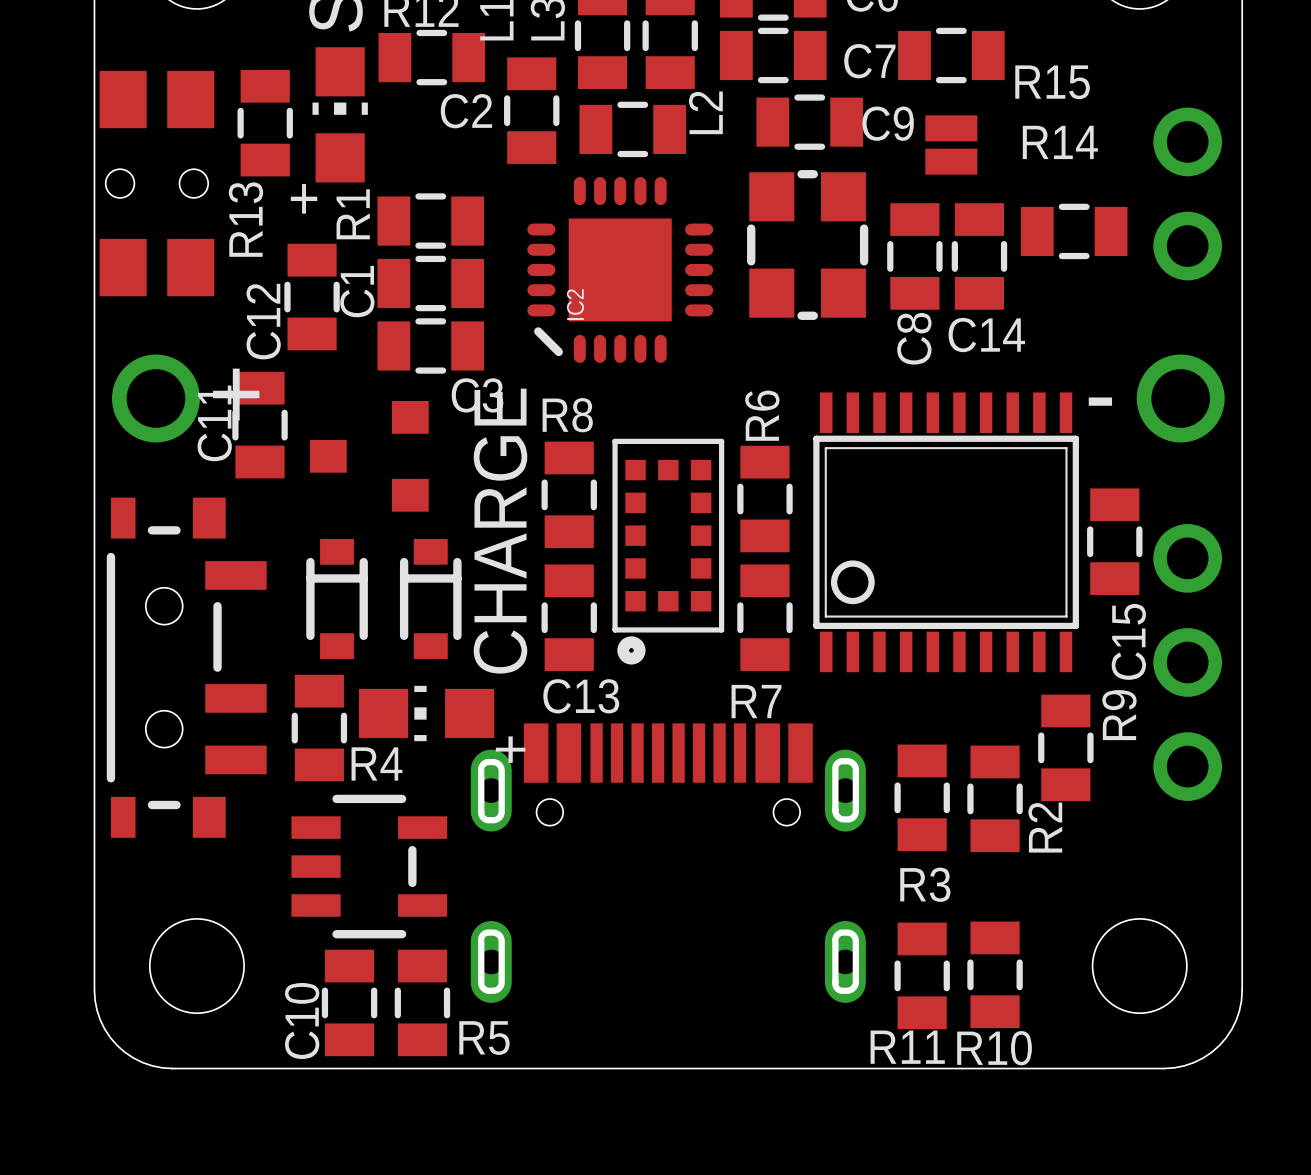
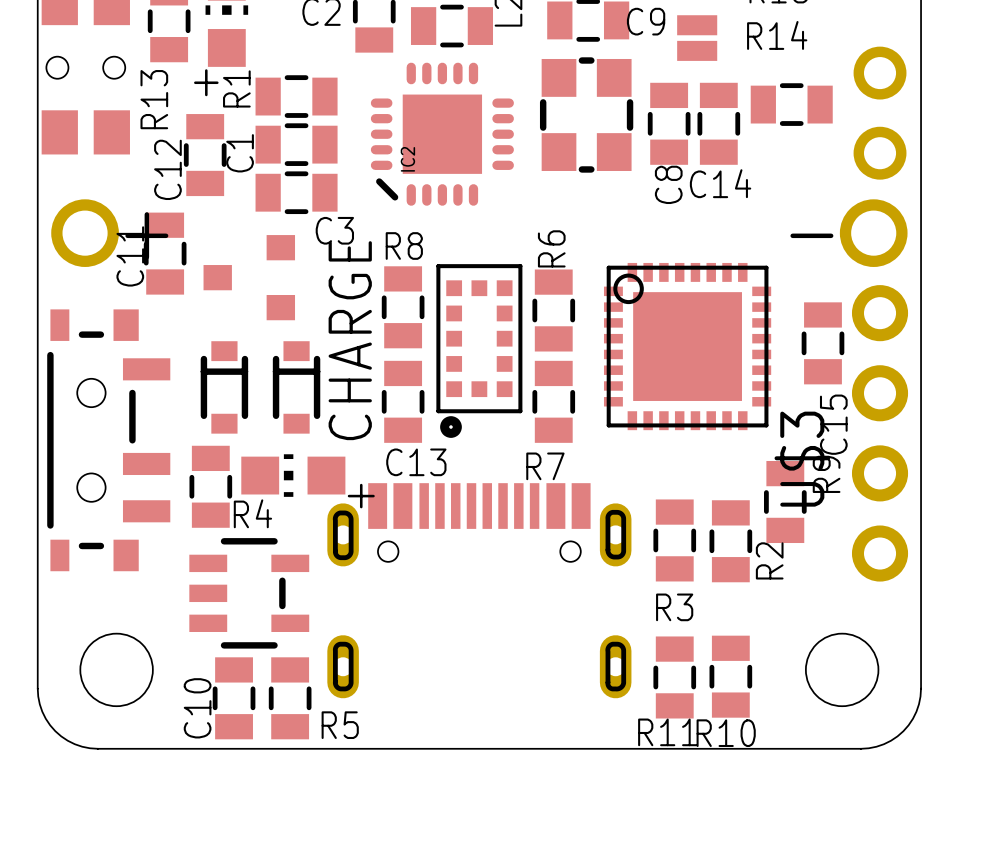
part position: (1187, 193) -> (880, 113)
part footprint: [813, 392, 1079, 673] -> [603, 262, 772, 431]
U$3: none -> (880, 433)
part: (1187, 662) -> none

